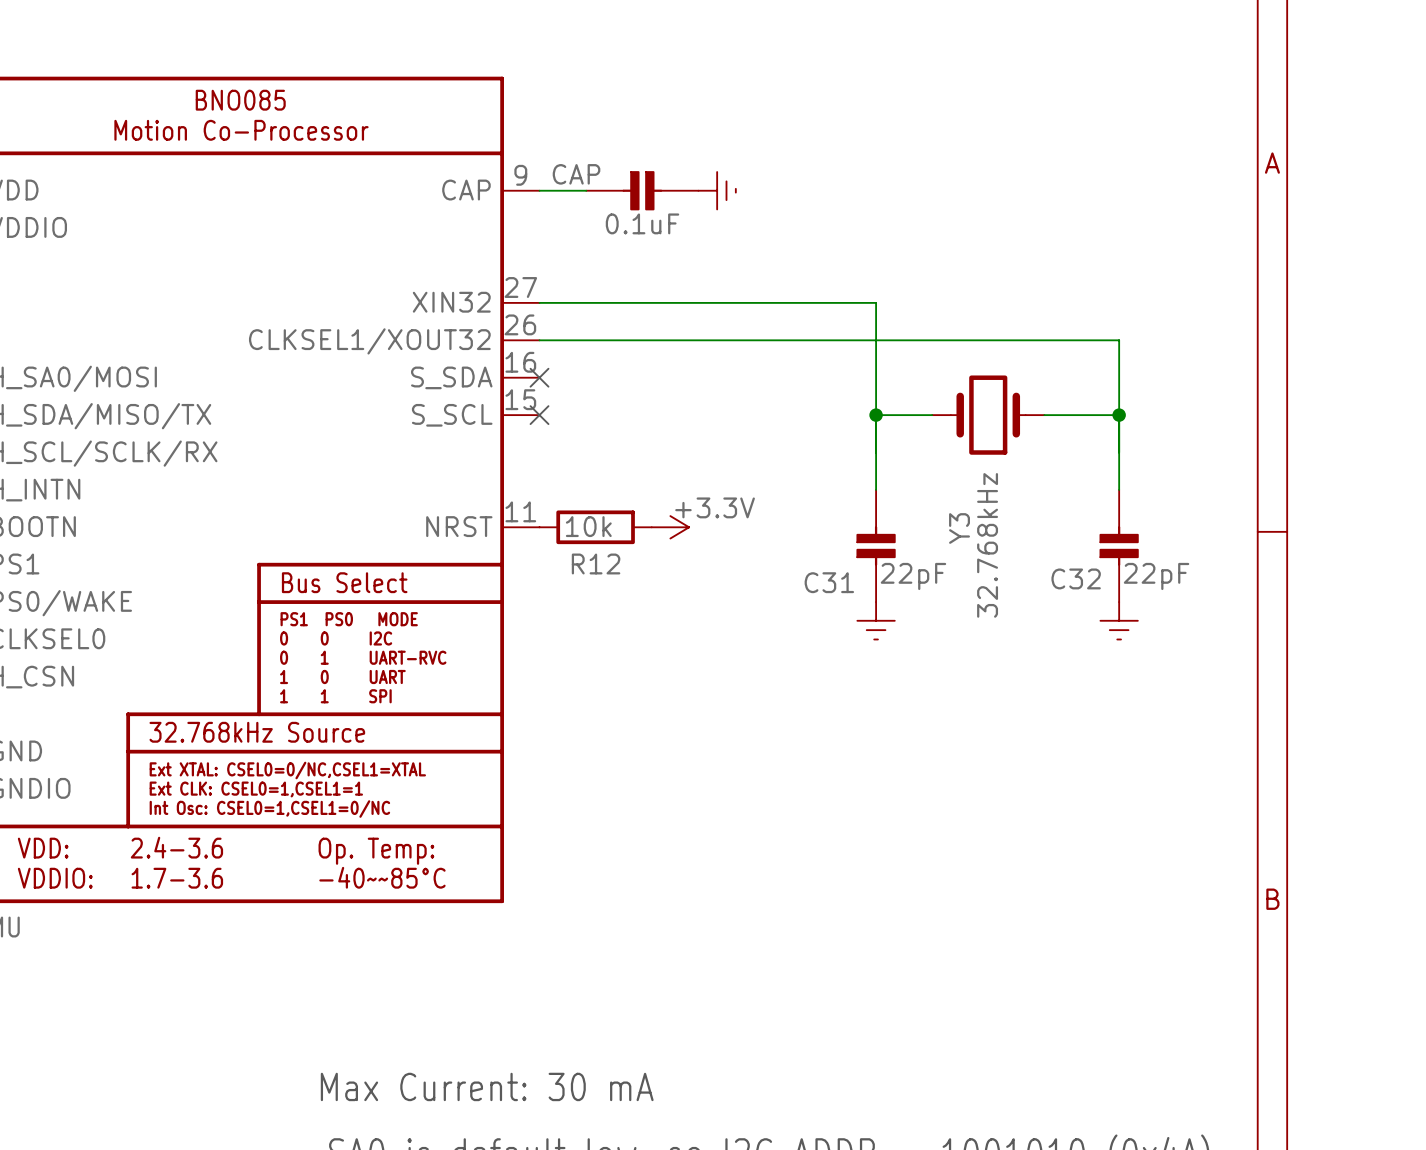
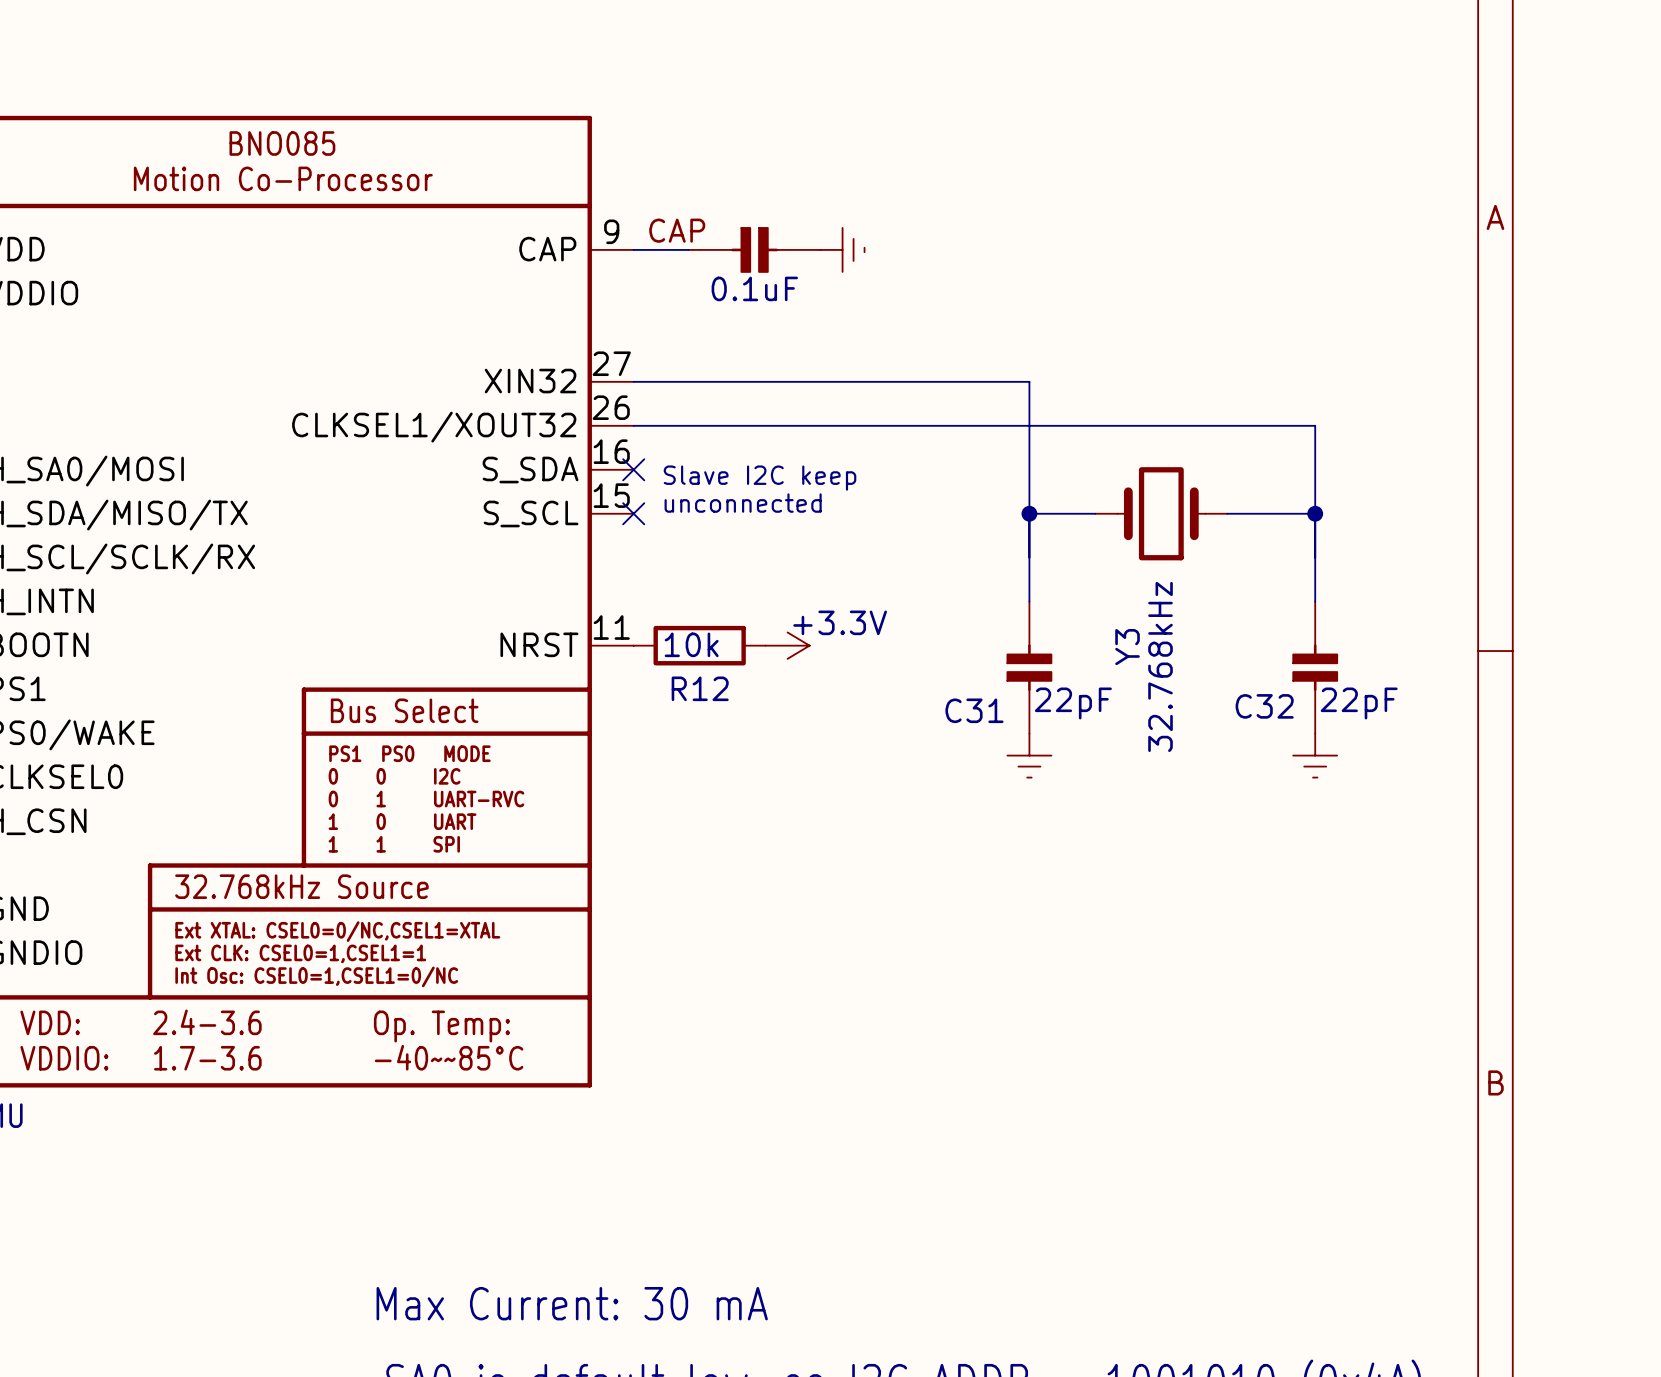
text: none -> Slave I2C keep (760, 478)
text: none -> unconnected (743, 503)

